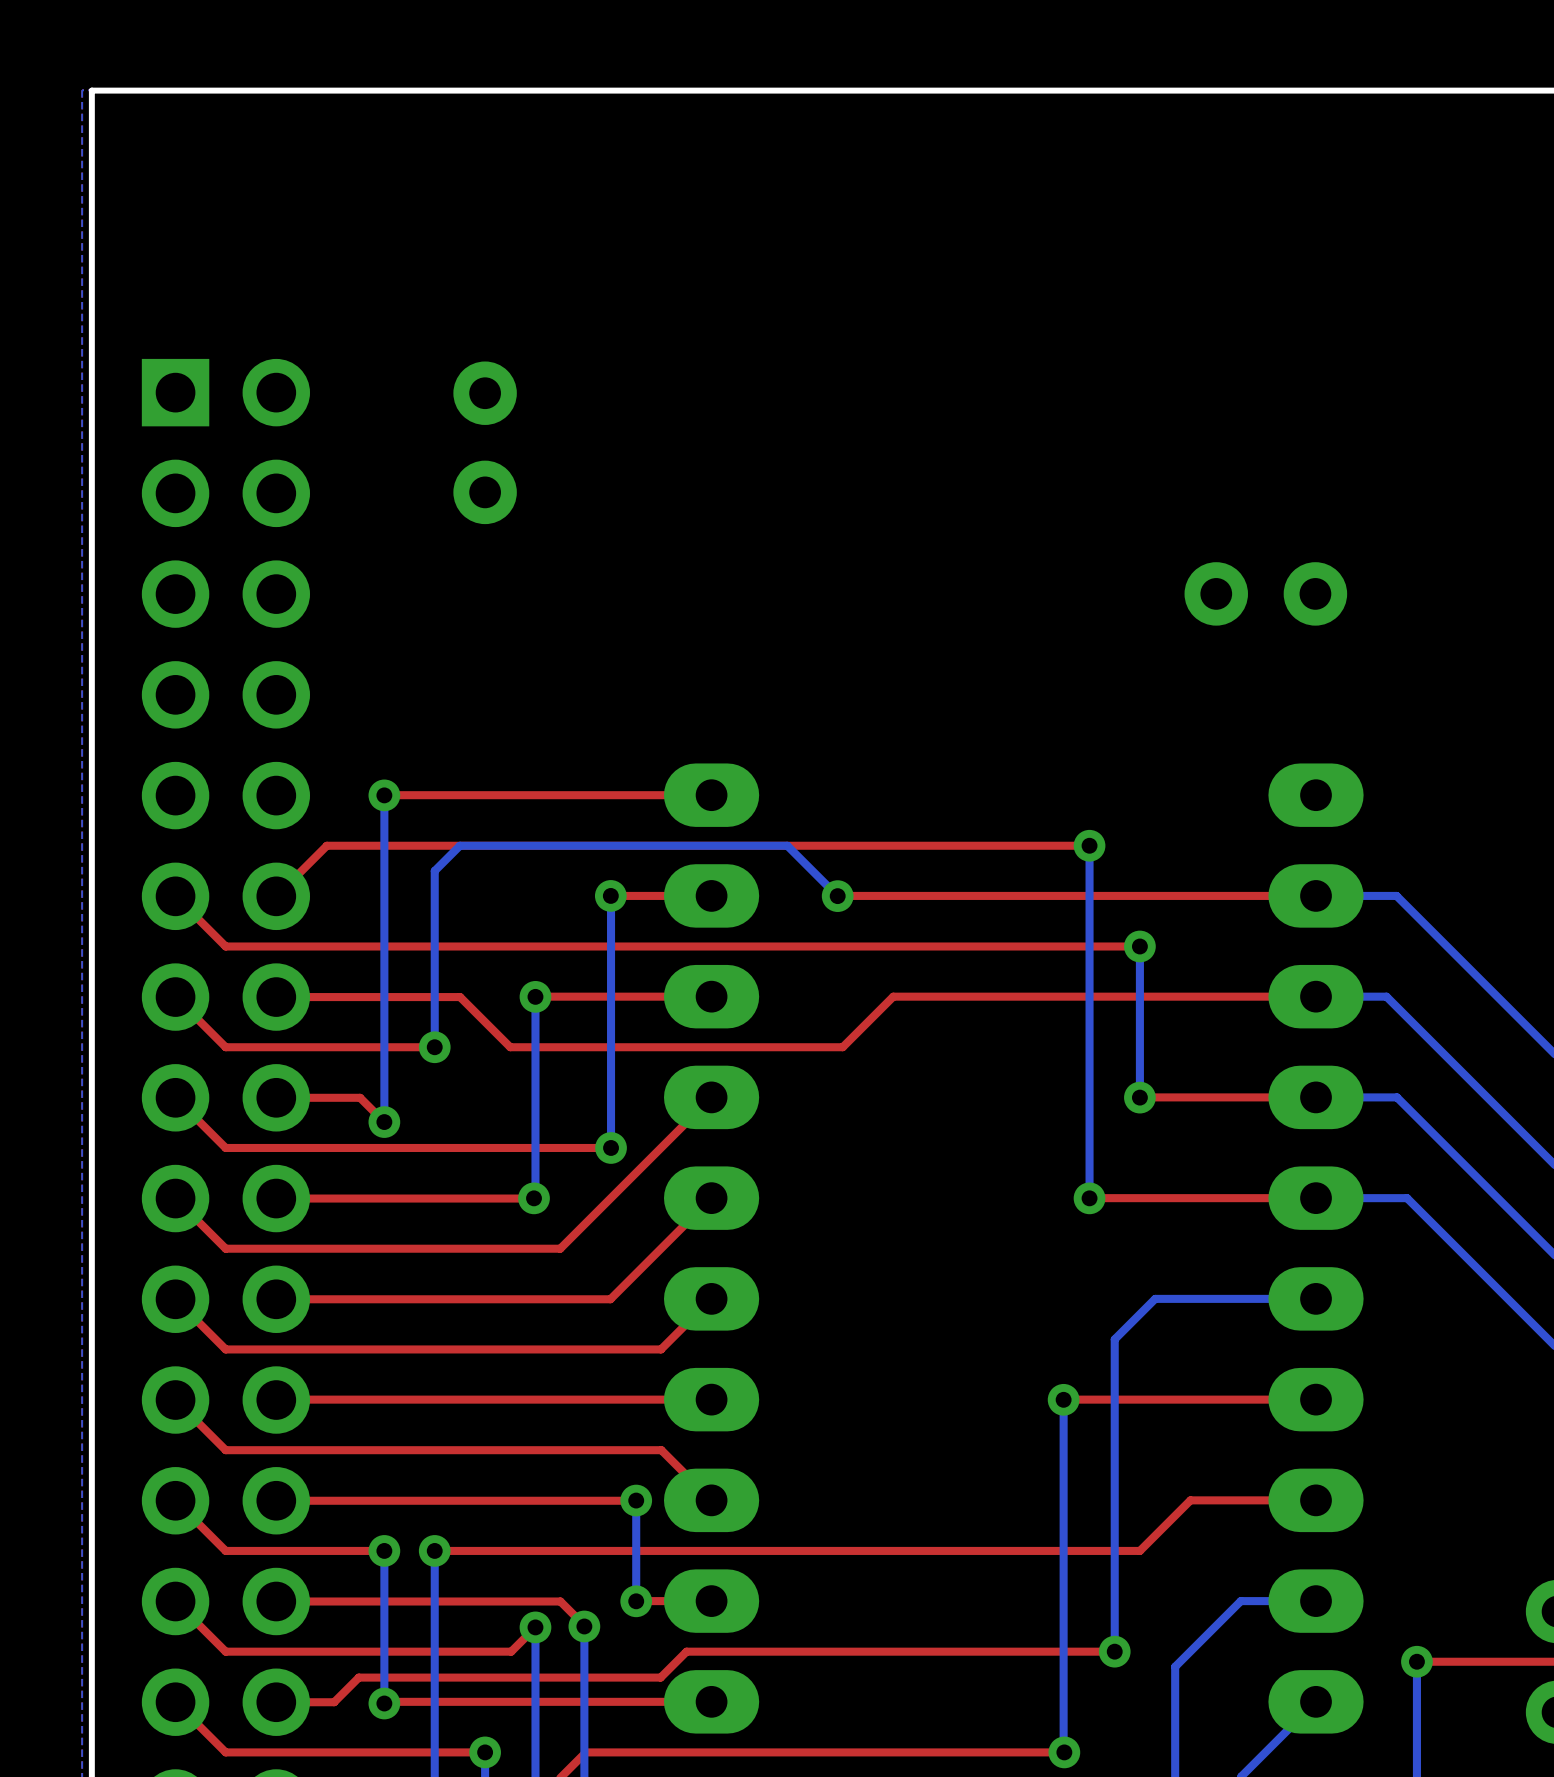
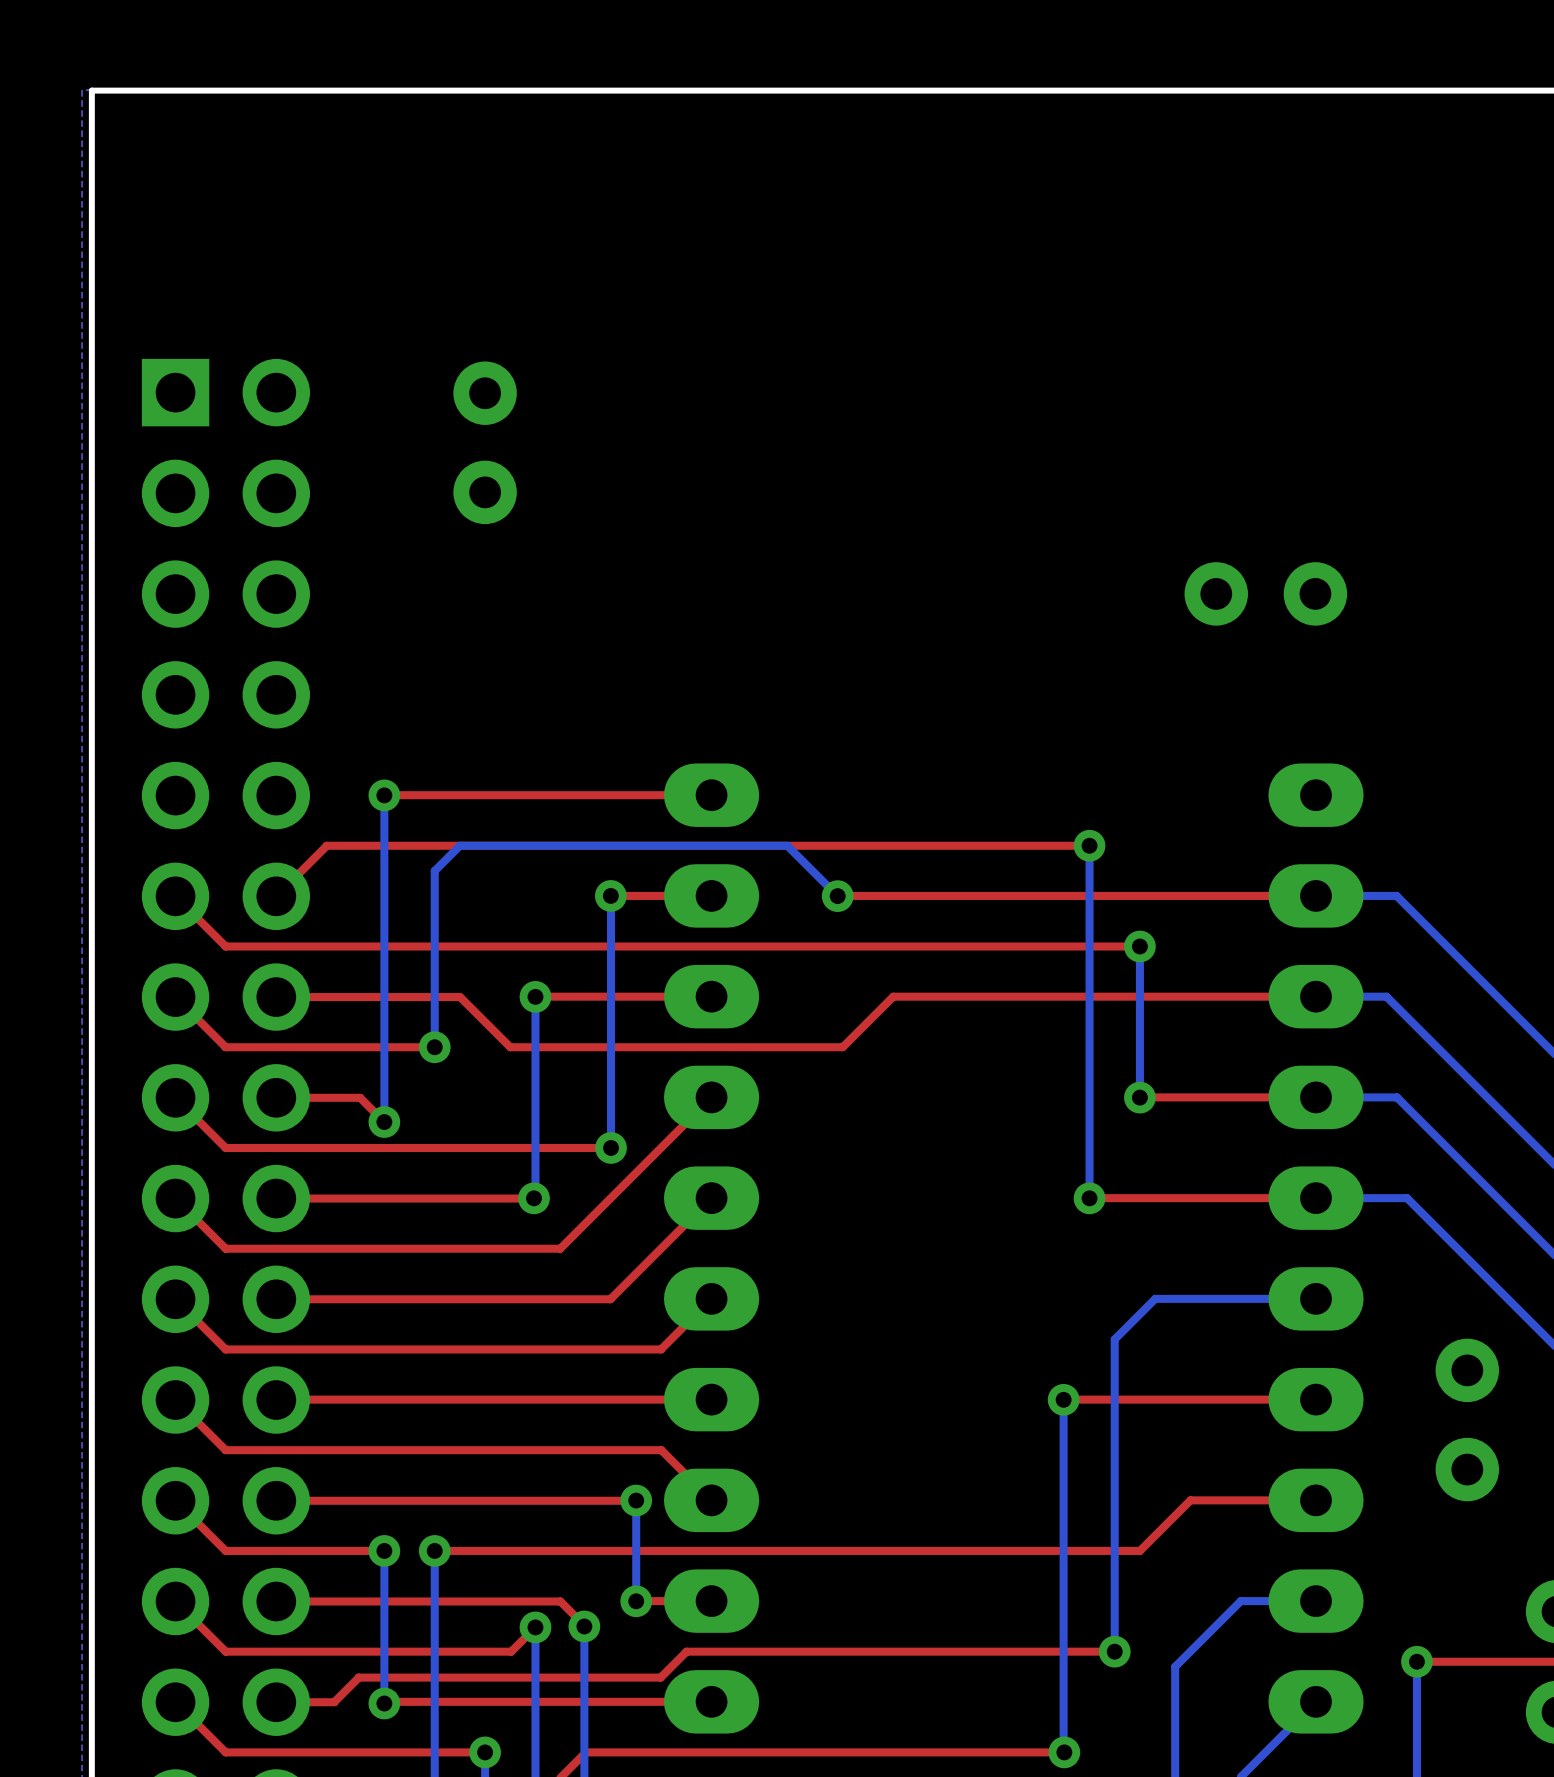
part: none -> (1467, 1419)

